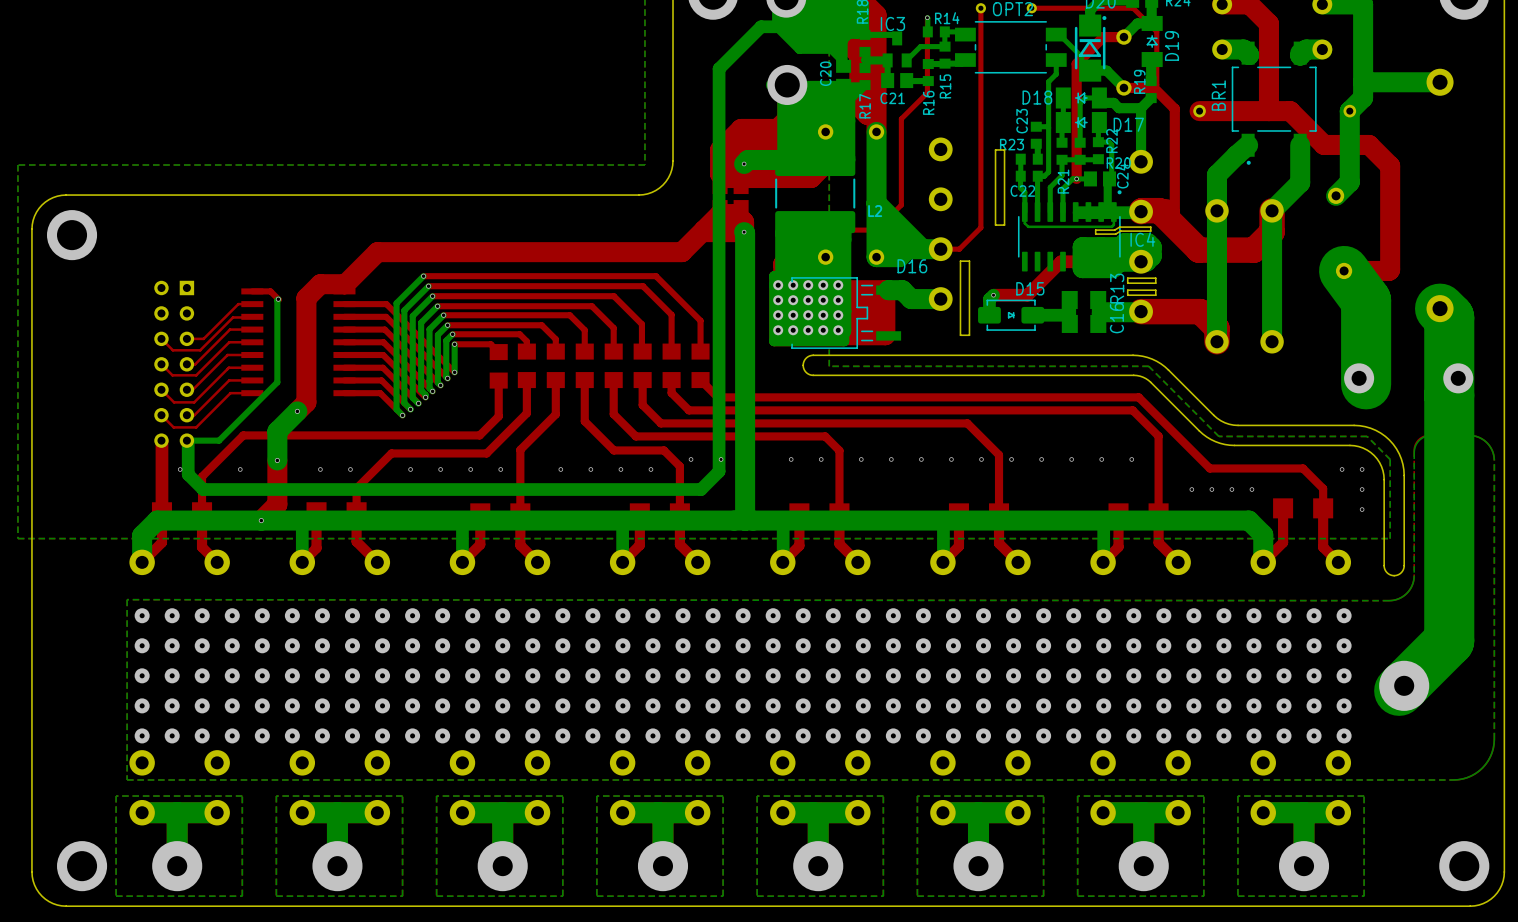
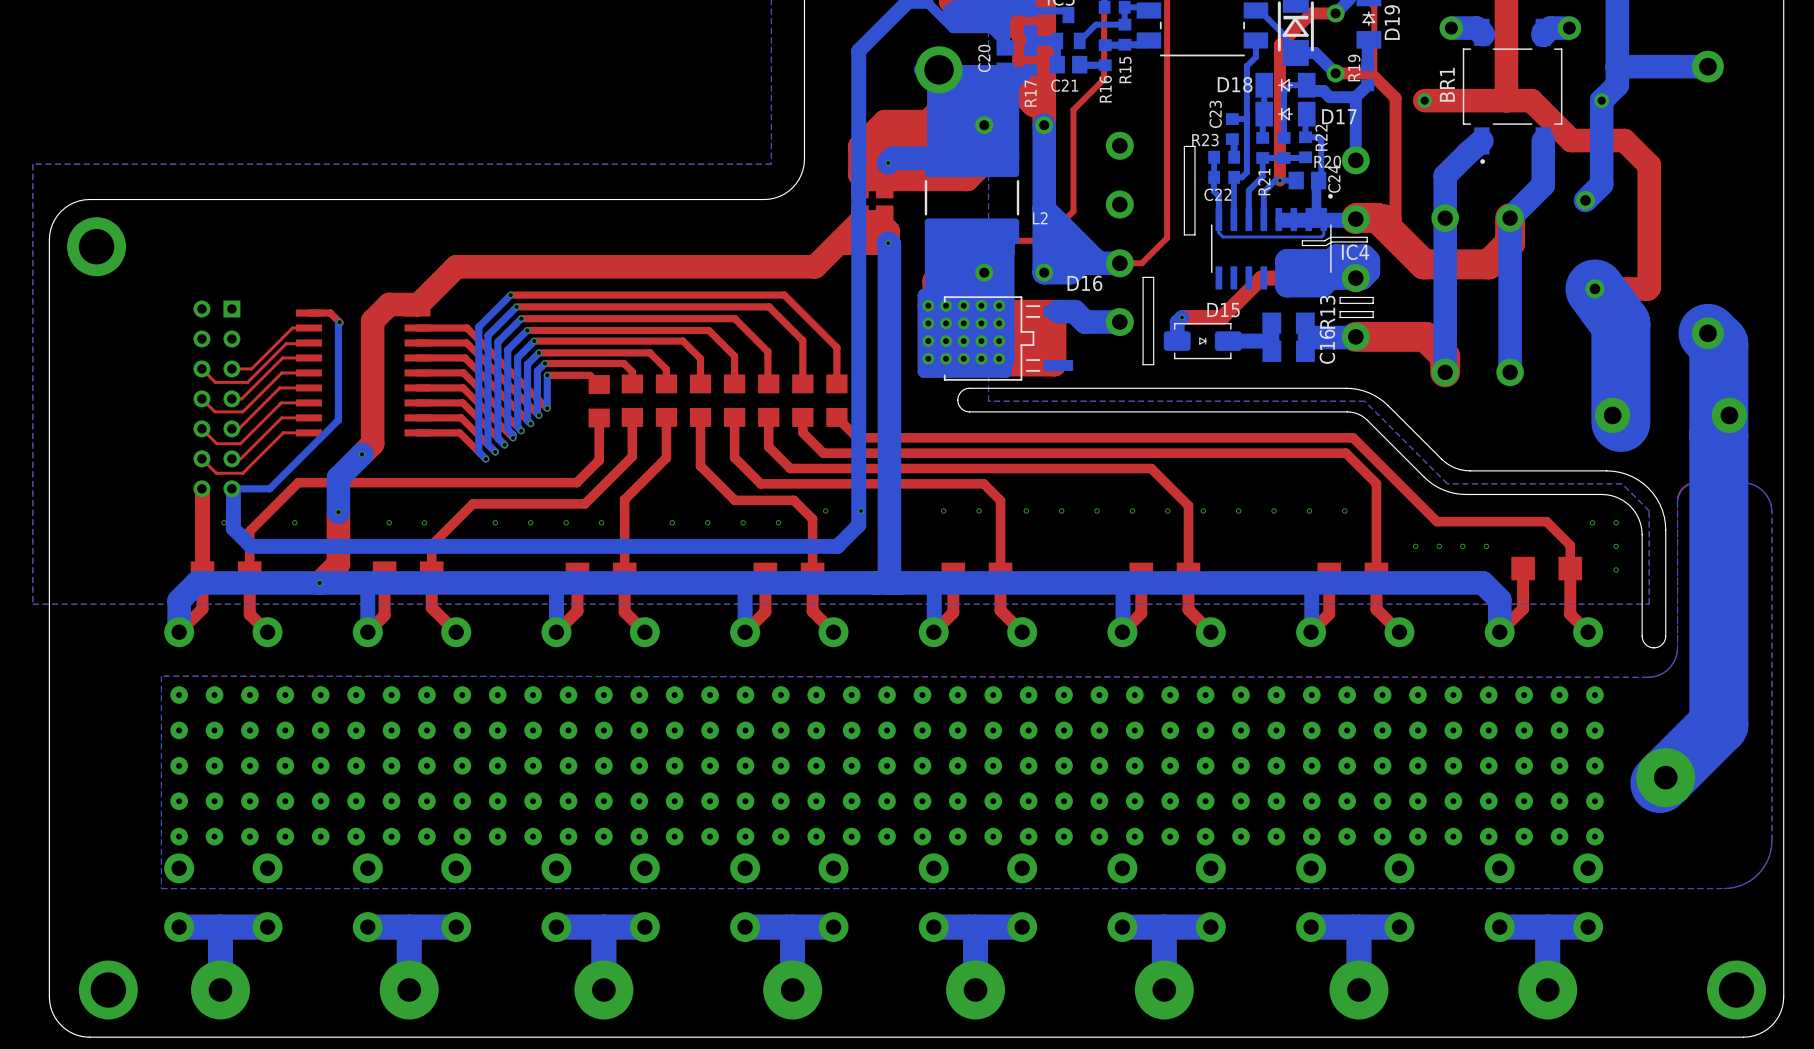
bottom zone outline: (242, 796) (116, 796) (116, 896) (242, 896) (242, 796) -> none
bottom zone outline: (402, 796) (276, 796) (276, 896) (402, 896) (402, 796) -> none
bottom zone outline: (562, 796) (436, 796) (436, 896) (562, 896) (562, 796) -> none
bottom zone outline: (723, 796) (596, 796) (596, 896) (723, 896) (723, 796) -> none
bottom zone outline: (883, 796) (757, 796) (757, 896) (883, 896) (883, 796) -> none
bottom zone outline: (1043, 796) (917, 796) (917, 896) (1043, 896) (1043, 796) -> none
bottom zone outline: (1203, 796) (1077, 796) (1077, 896) (1203, 896) (1203, 796) -> none
bottom zone outline: (1364, 796) (1237, 796) (1237, 896) (1364, 896) (1364, 796) -> none

